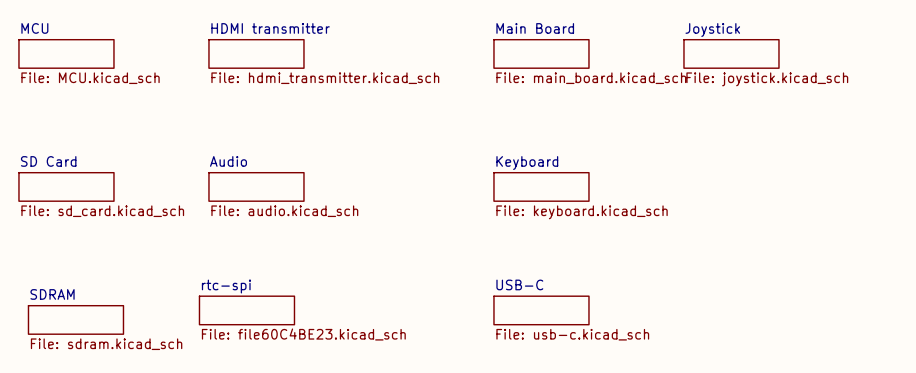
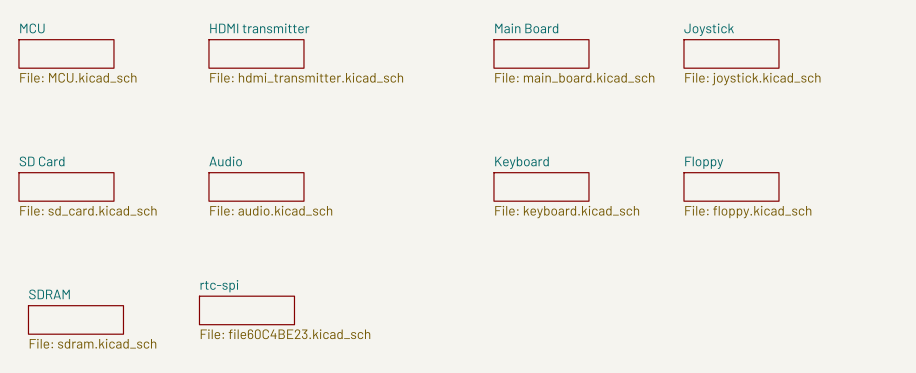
sheet Floppy: none -> File: floppy.kicad_sch (731, 186)
sheet USB-C: File: usb-c.kicad_sch (541, 310) -> none

